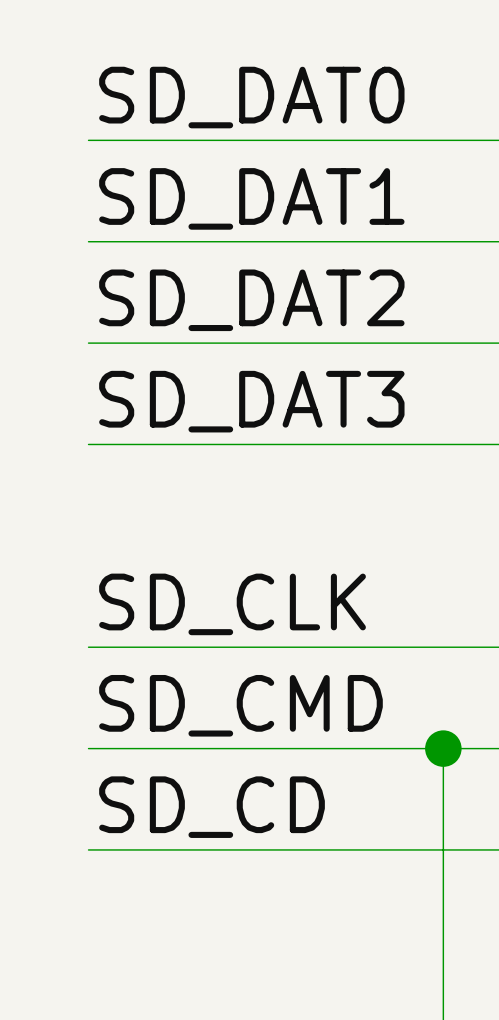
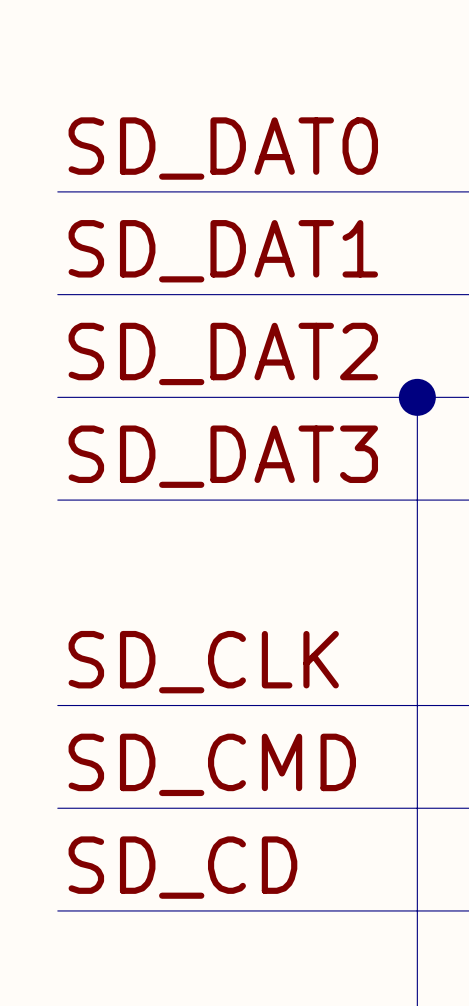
wire: none -> (417, 397) (417, 808)
junction: none -> (417, 397)
junction: (443, 748) -> none

